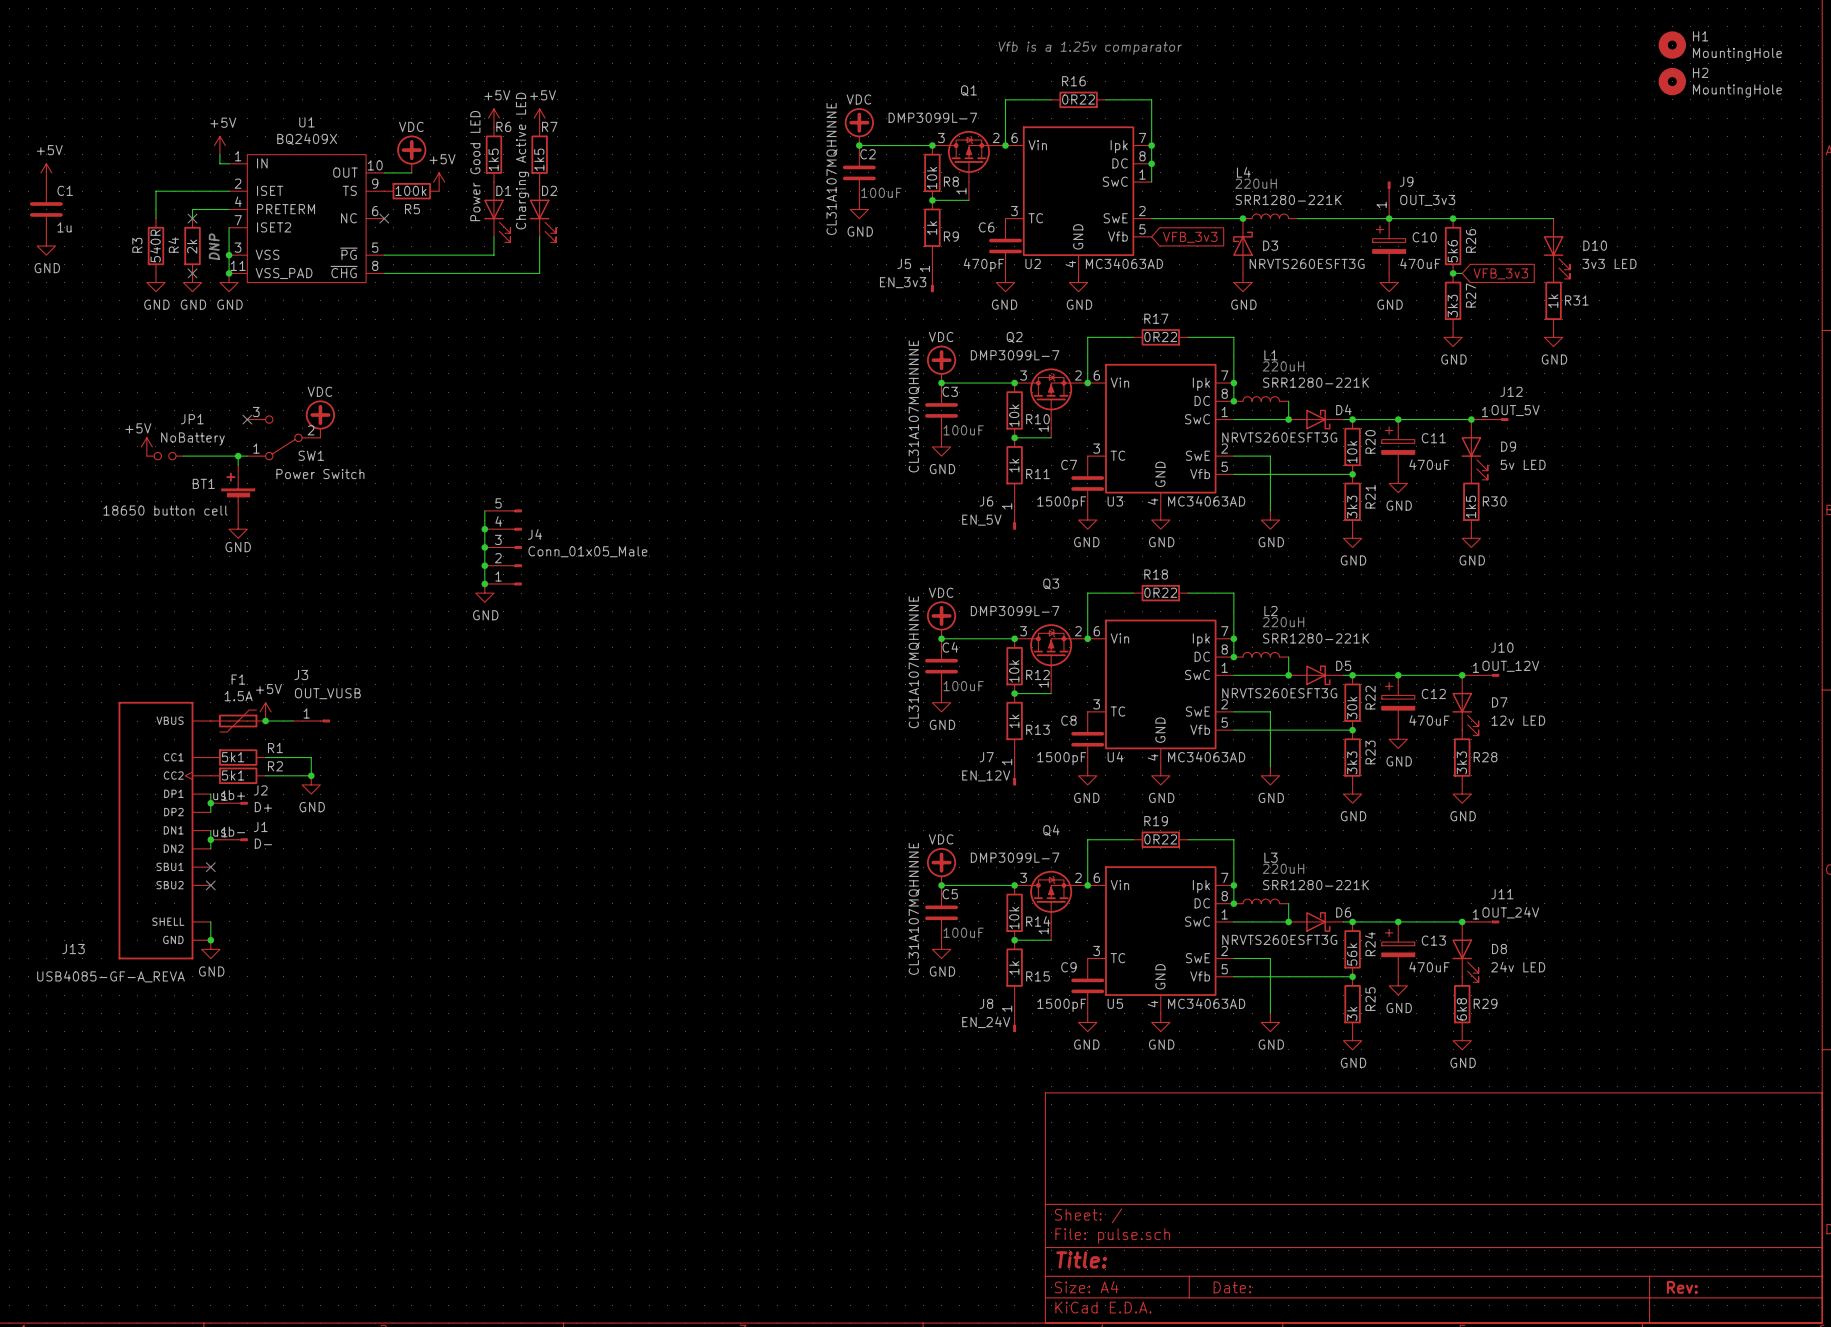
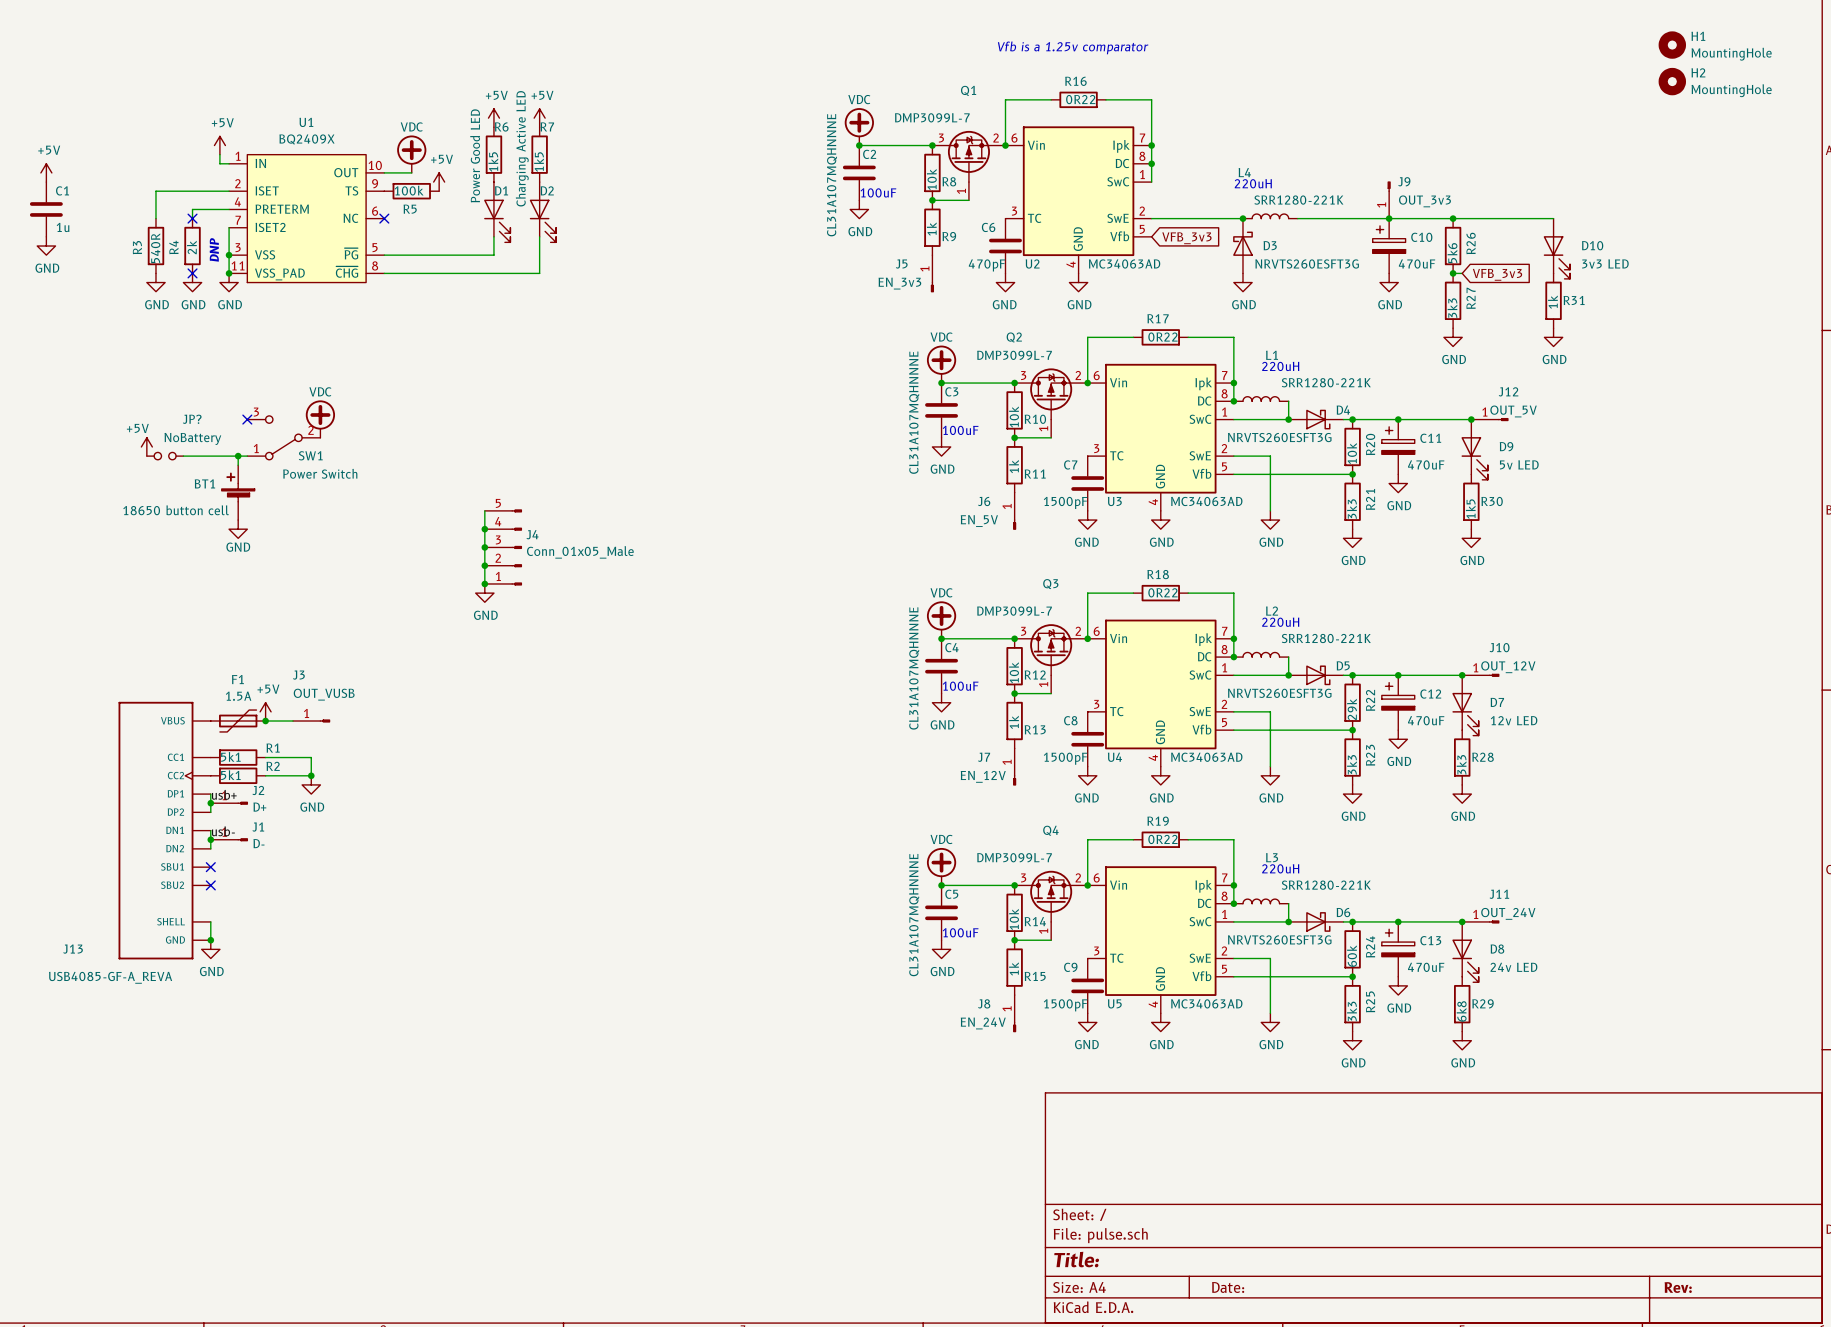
JP1 name: JP1 (192, 419) -> JP? (192, 419)
R22 value: 30k (1352, 708) -> 29k (1352, 709)
R24 value: 56k (1352, 954) -> 60k (1352, 956)
R25 value: 3k (1352, 1013) -> 3k3 (1351, 1011)

